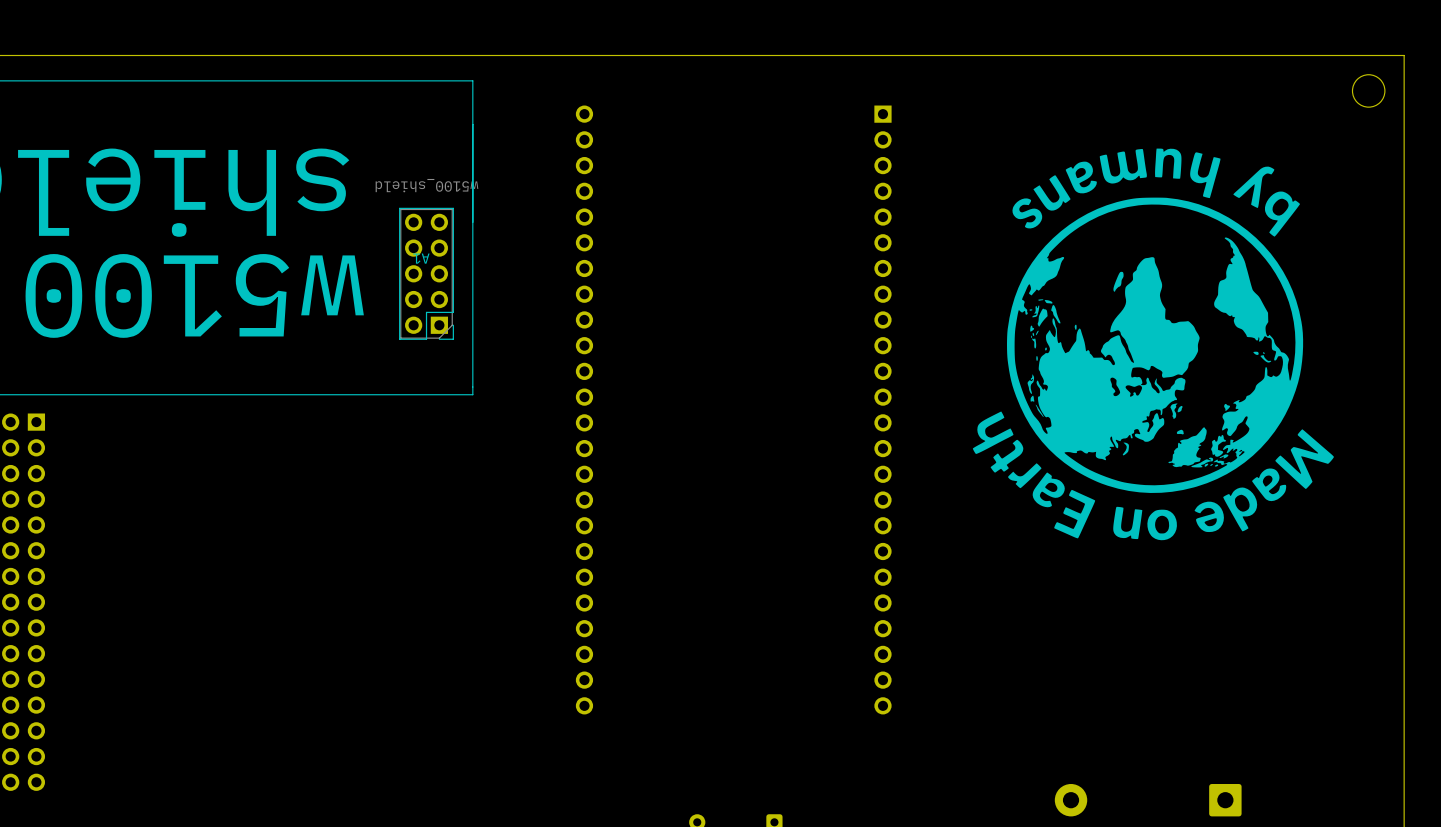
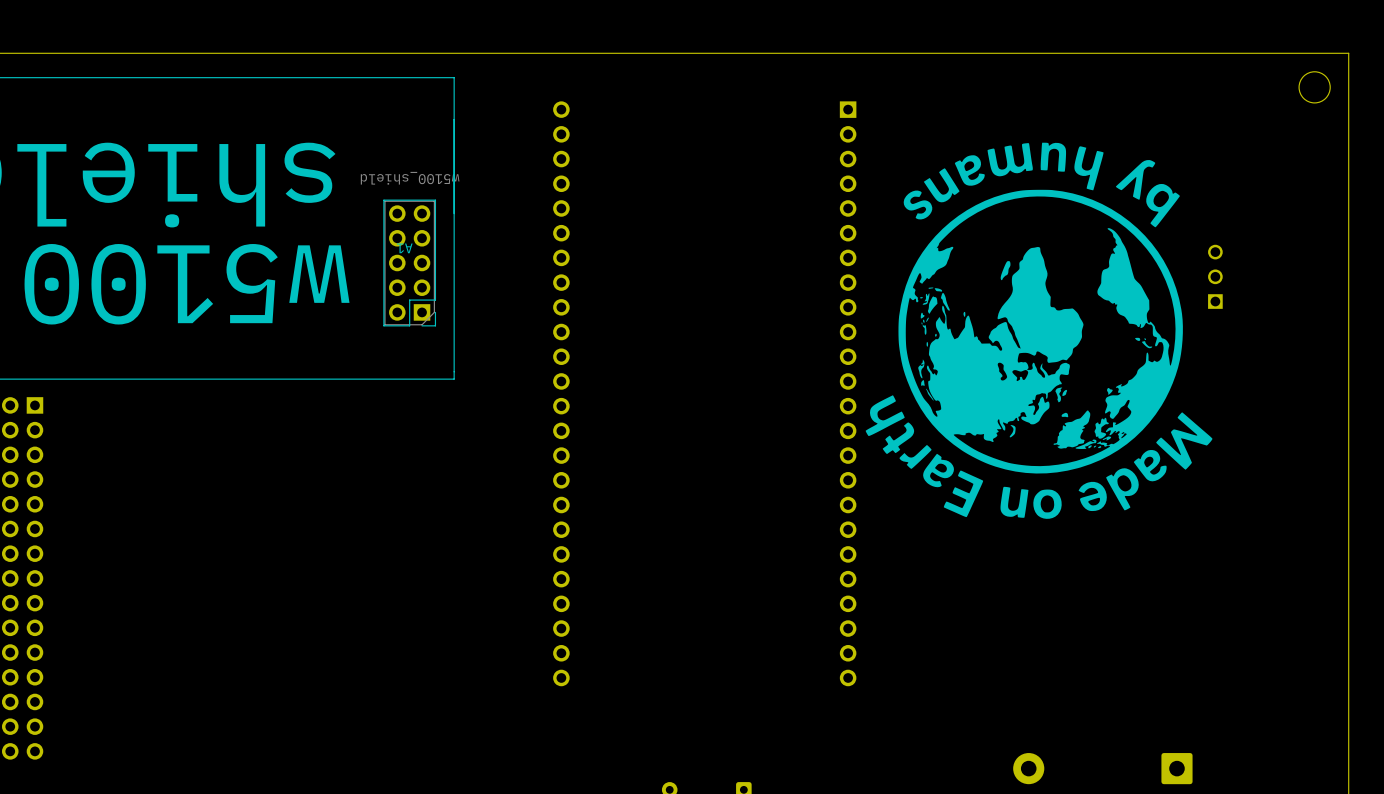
part: none -> (1215, 276)
drawing position: (1153, 344) -> (1039, 330)

